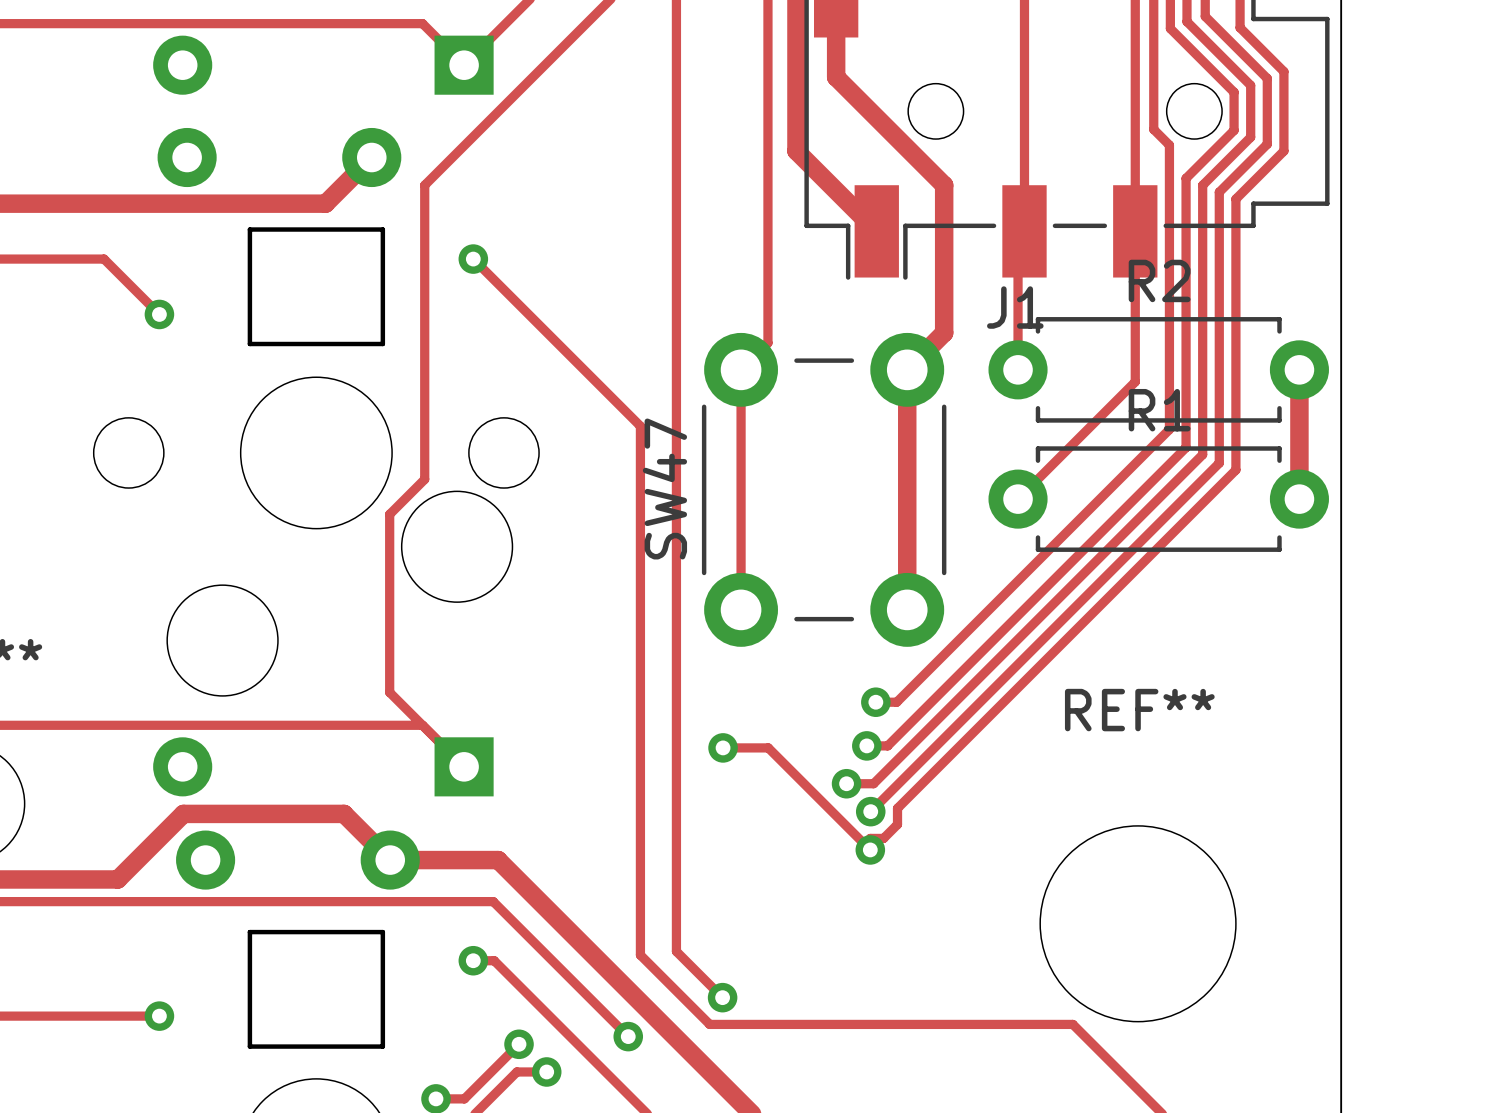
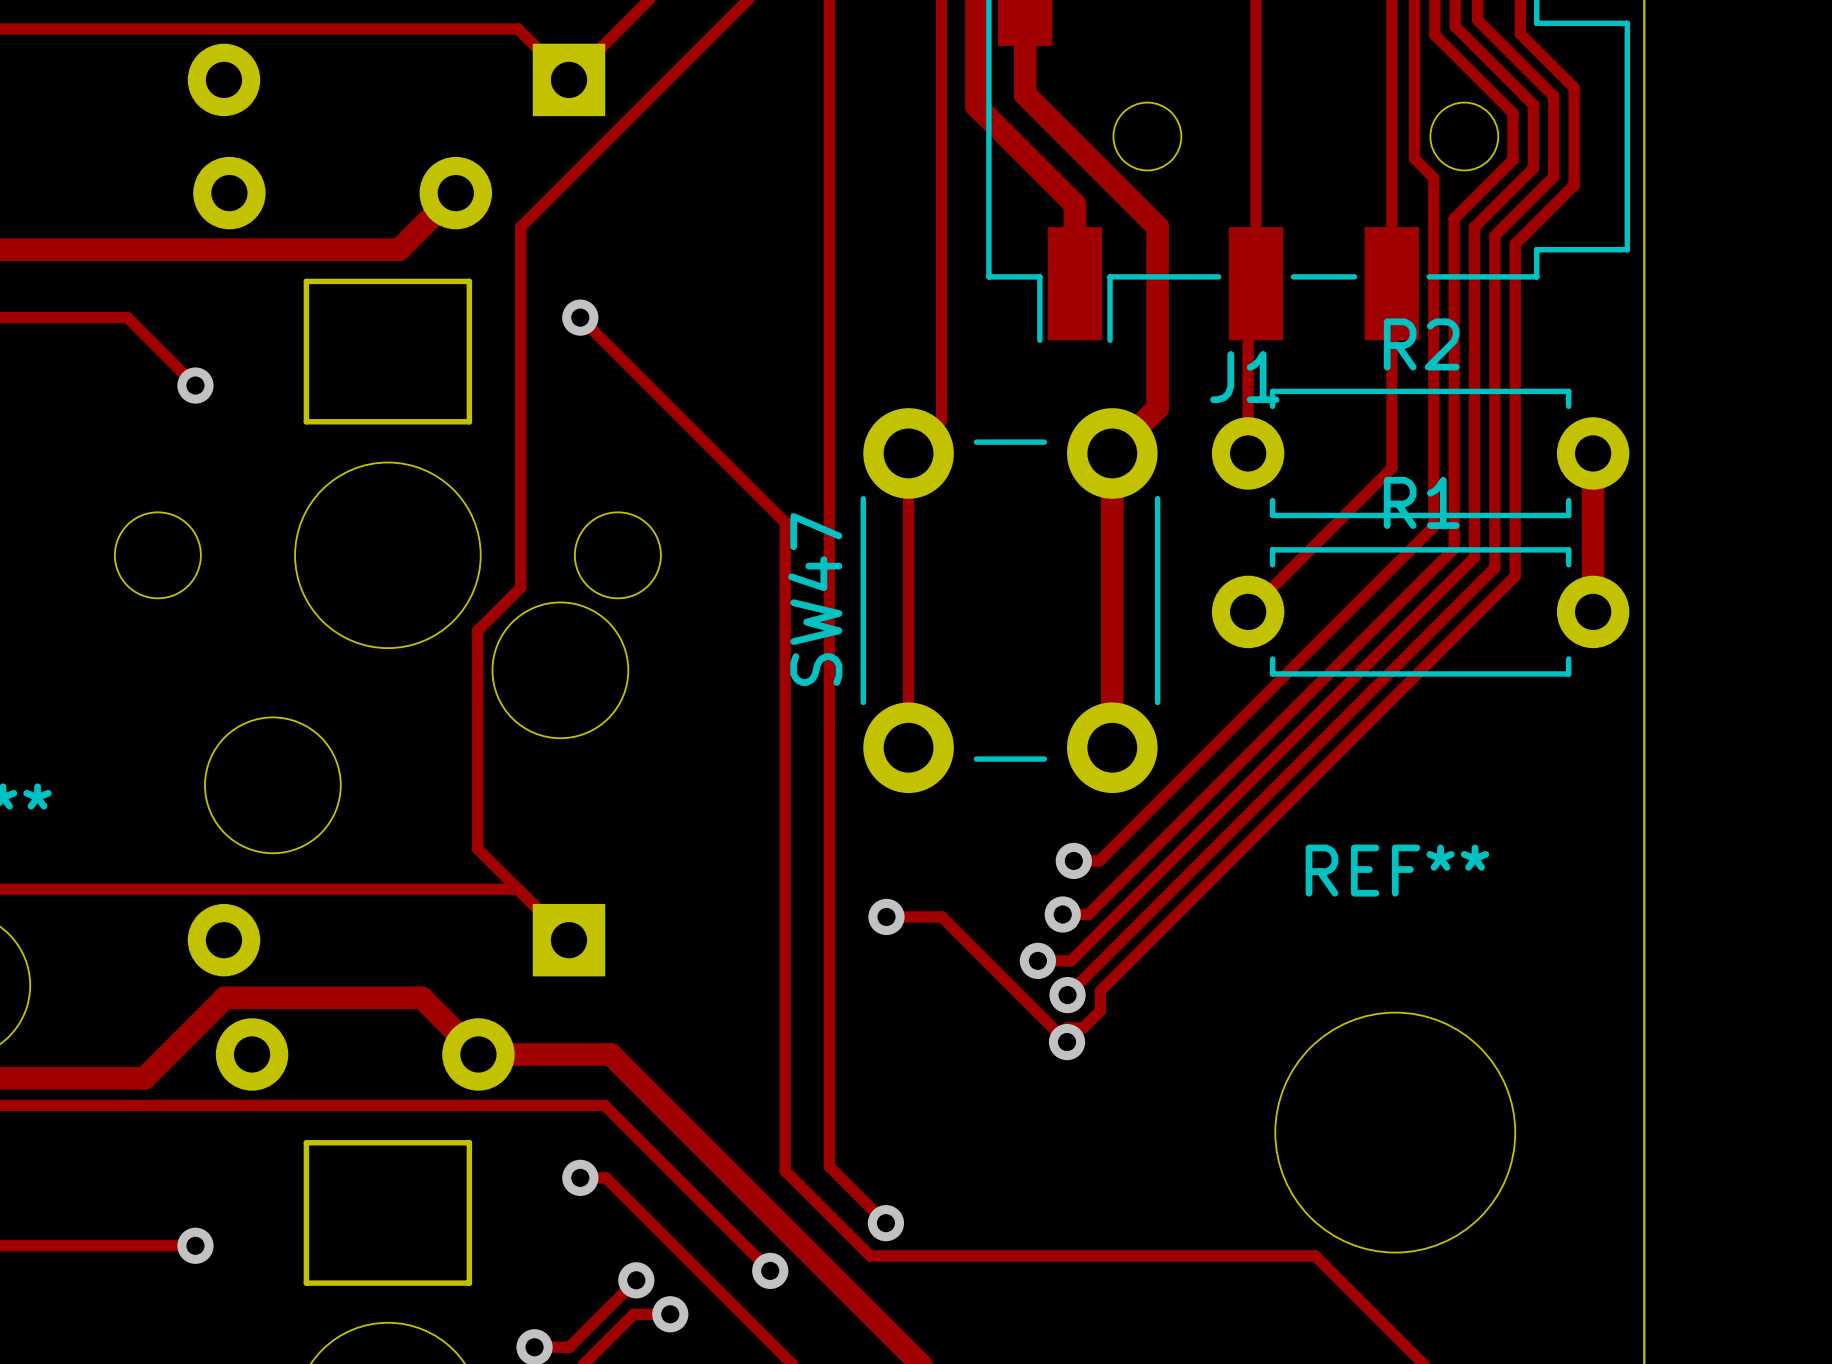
track: (796, 86) (796, 151) (876, 231) -> (976, 105) (1074, 204) (1074, 283)

